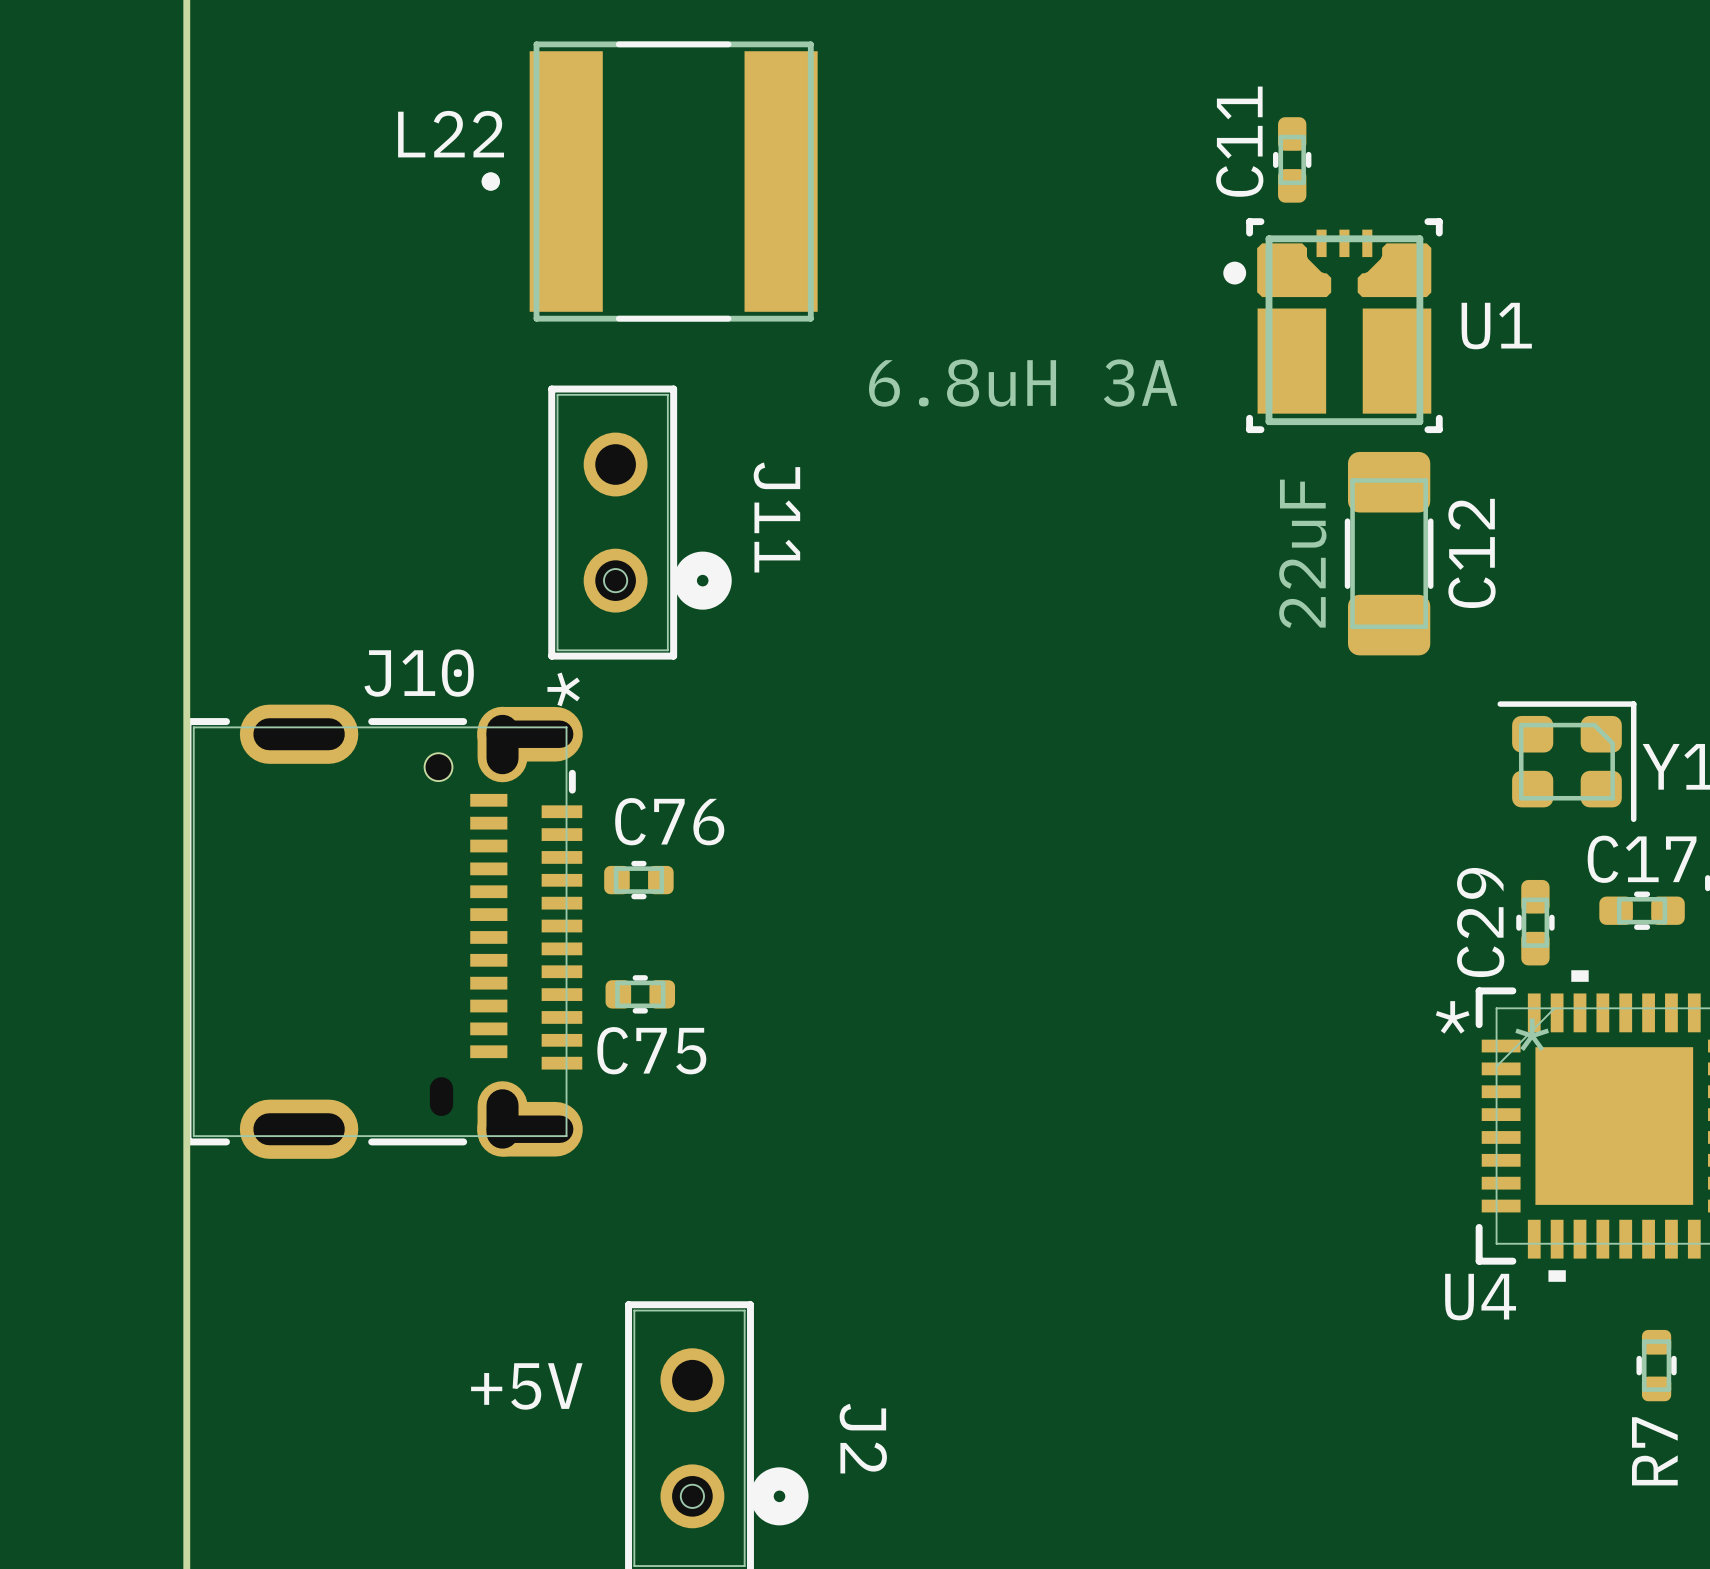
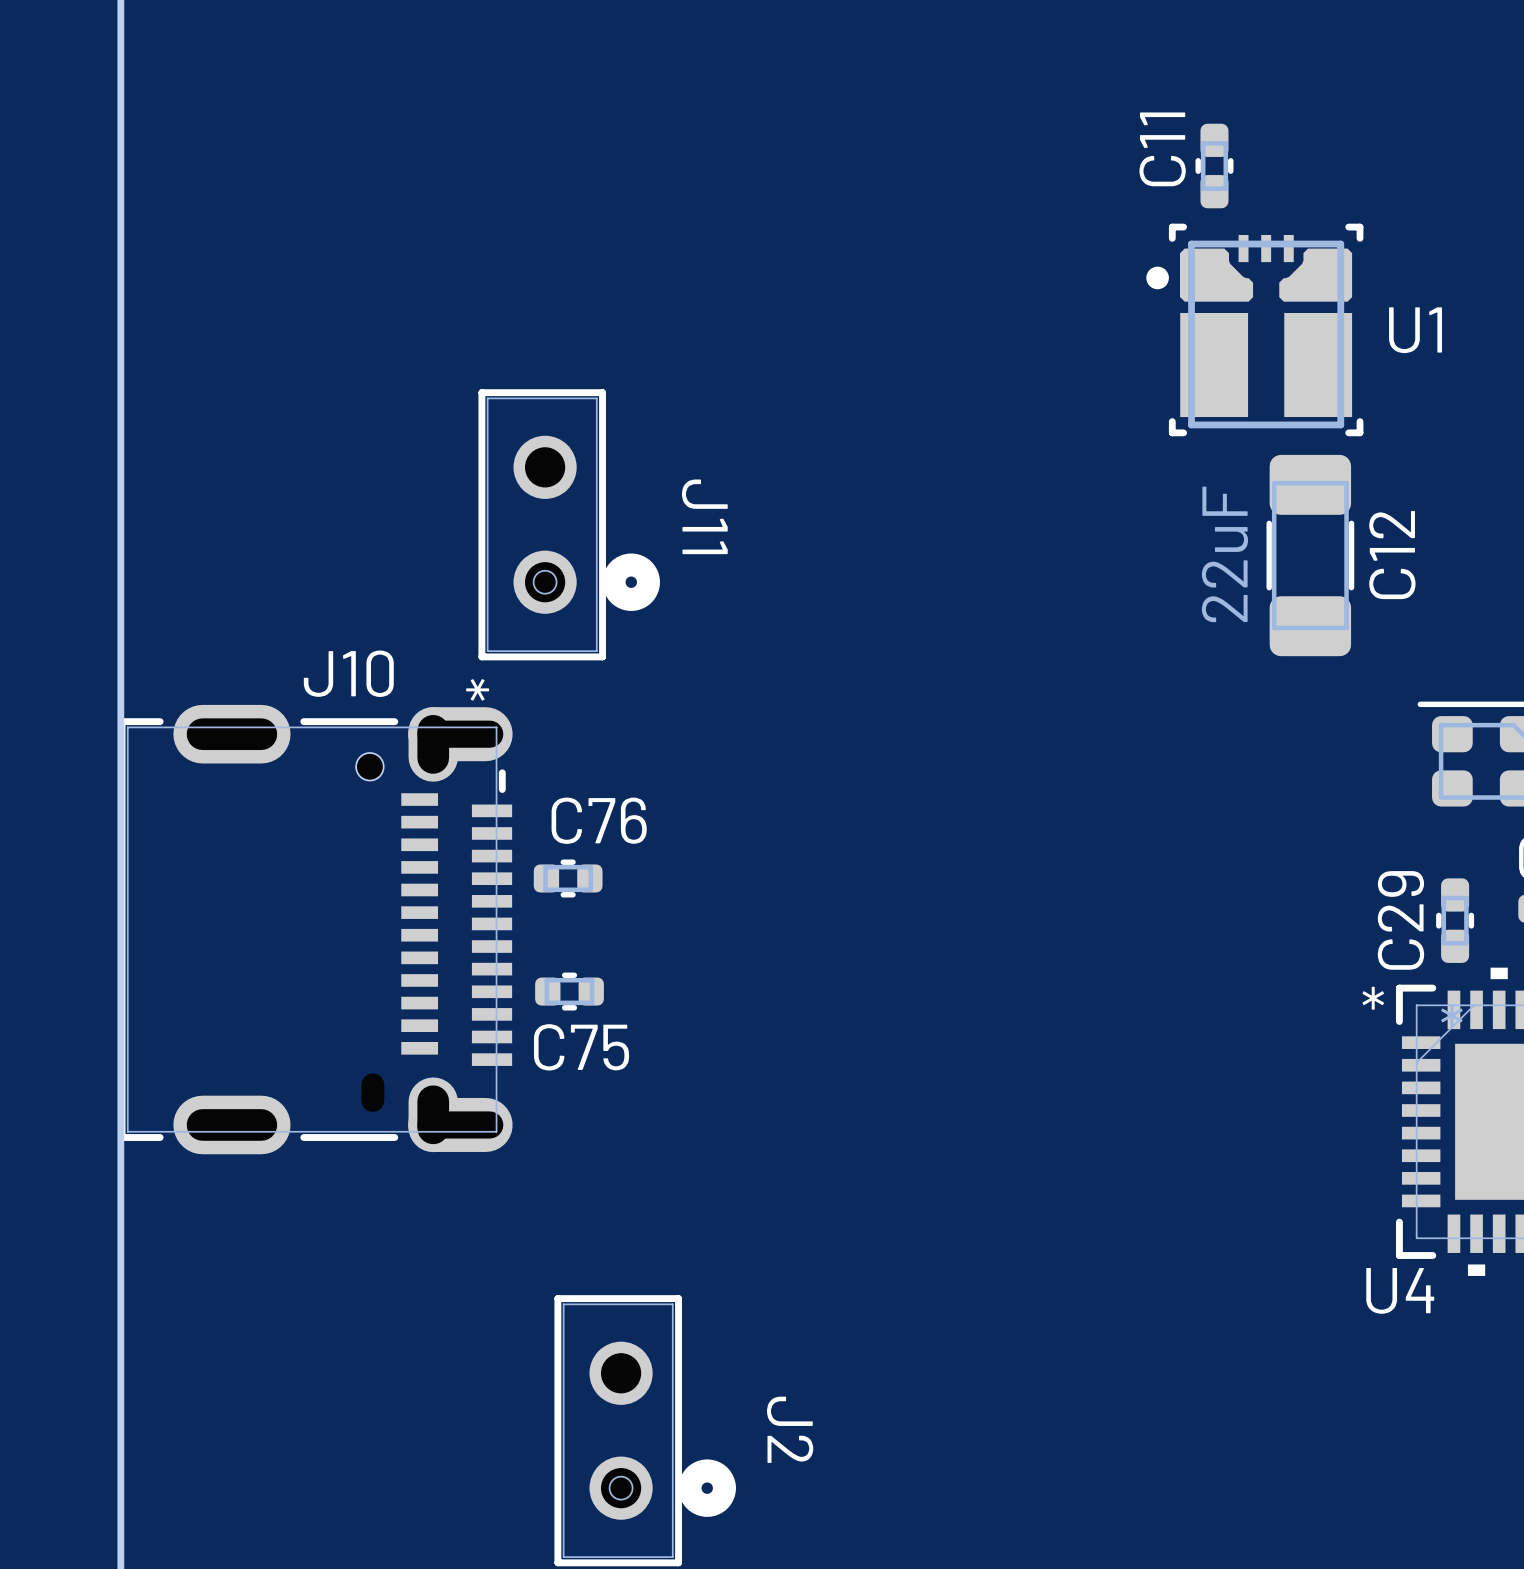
L22: 6.8uH 3A (649, 181) -> none
text: +5V (526, 1386) -> none

